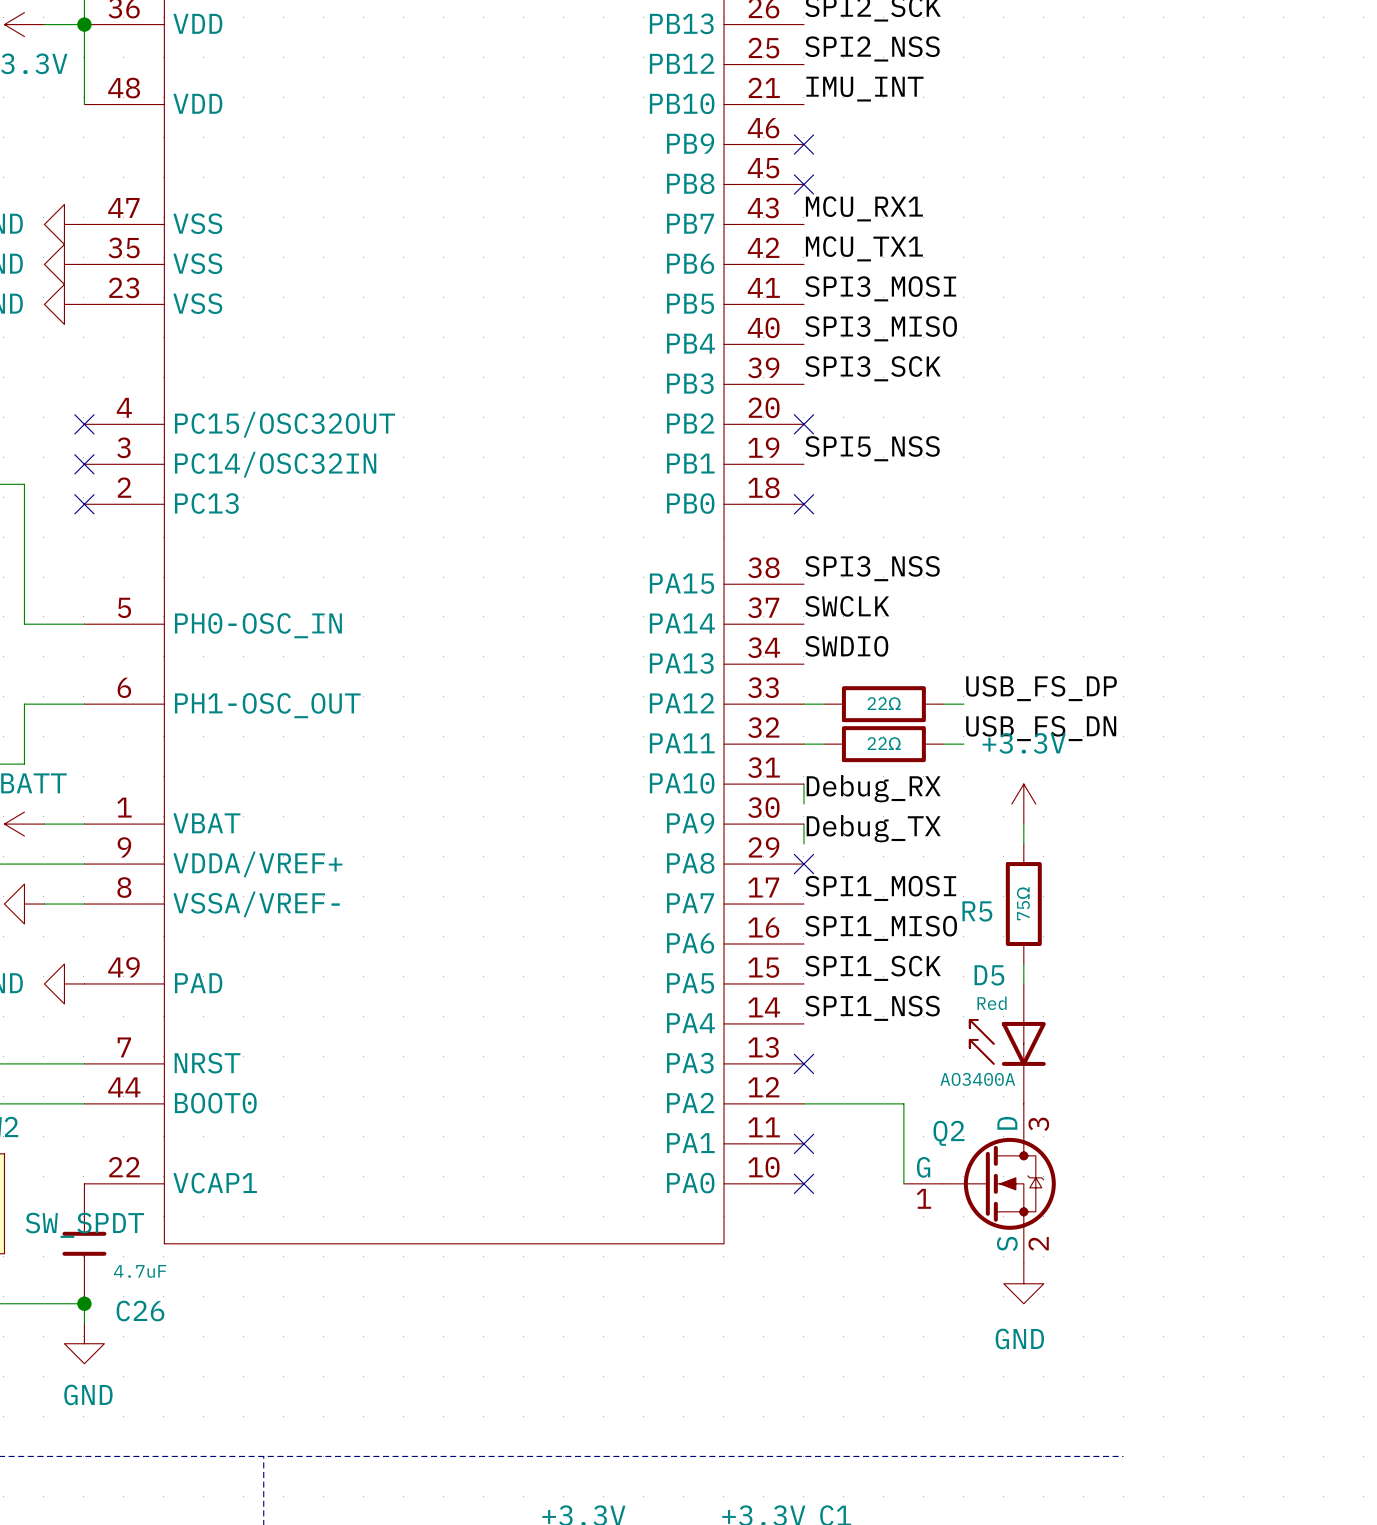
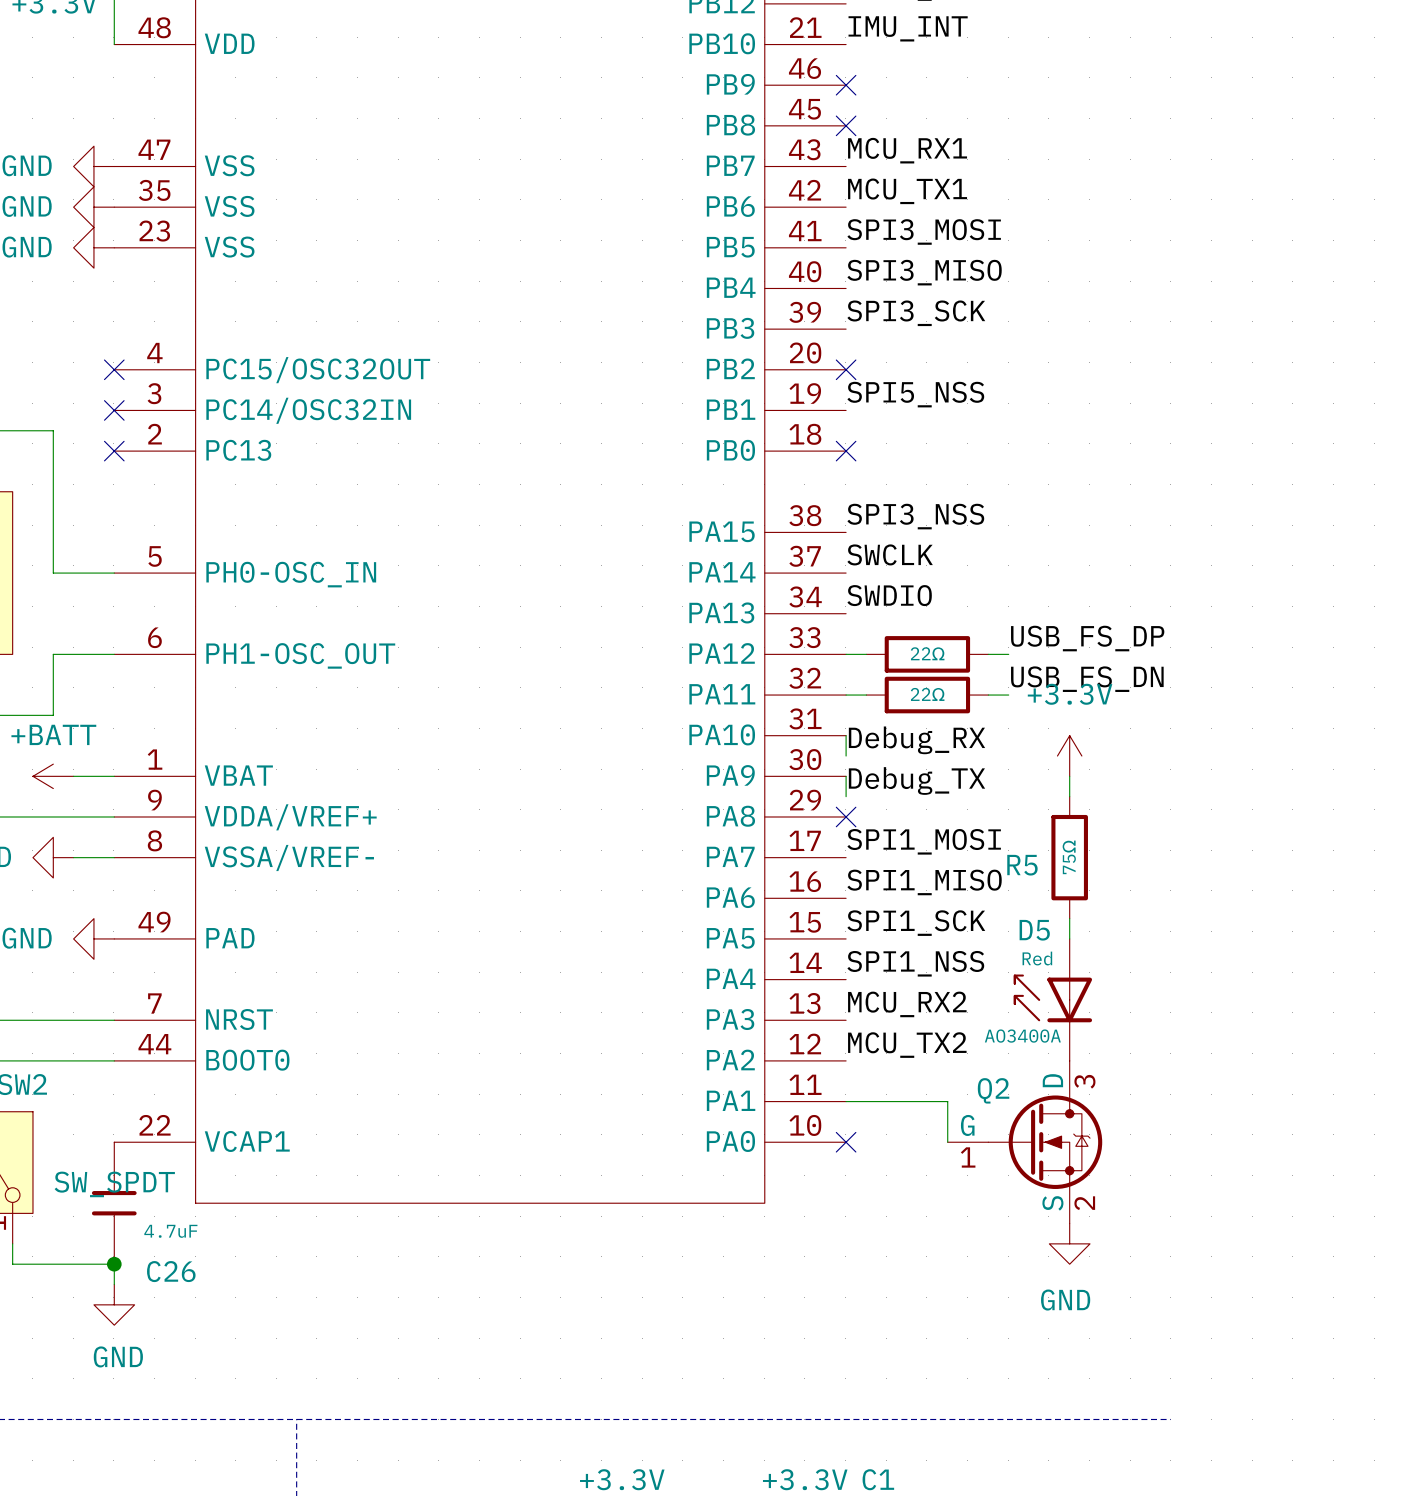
label: none -> MCU_RX2 (907, 1004)
no-connect mark: (803, 1063) -> none
label: none -> MCU_TX2 (907, 1045)
wire: (803, 1103) (903, 1103) (903, 1143) -> (846, 1101) (947, 1101)
no-connect mark: (803, 1143) -> none

